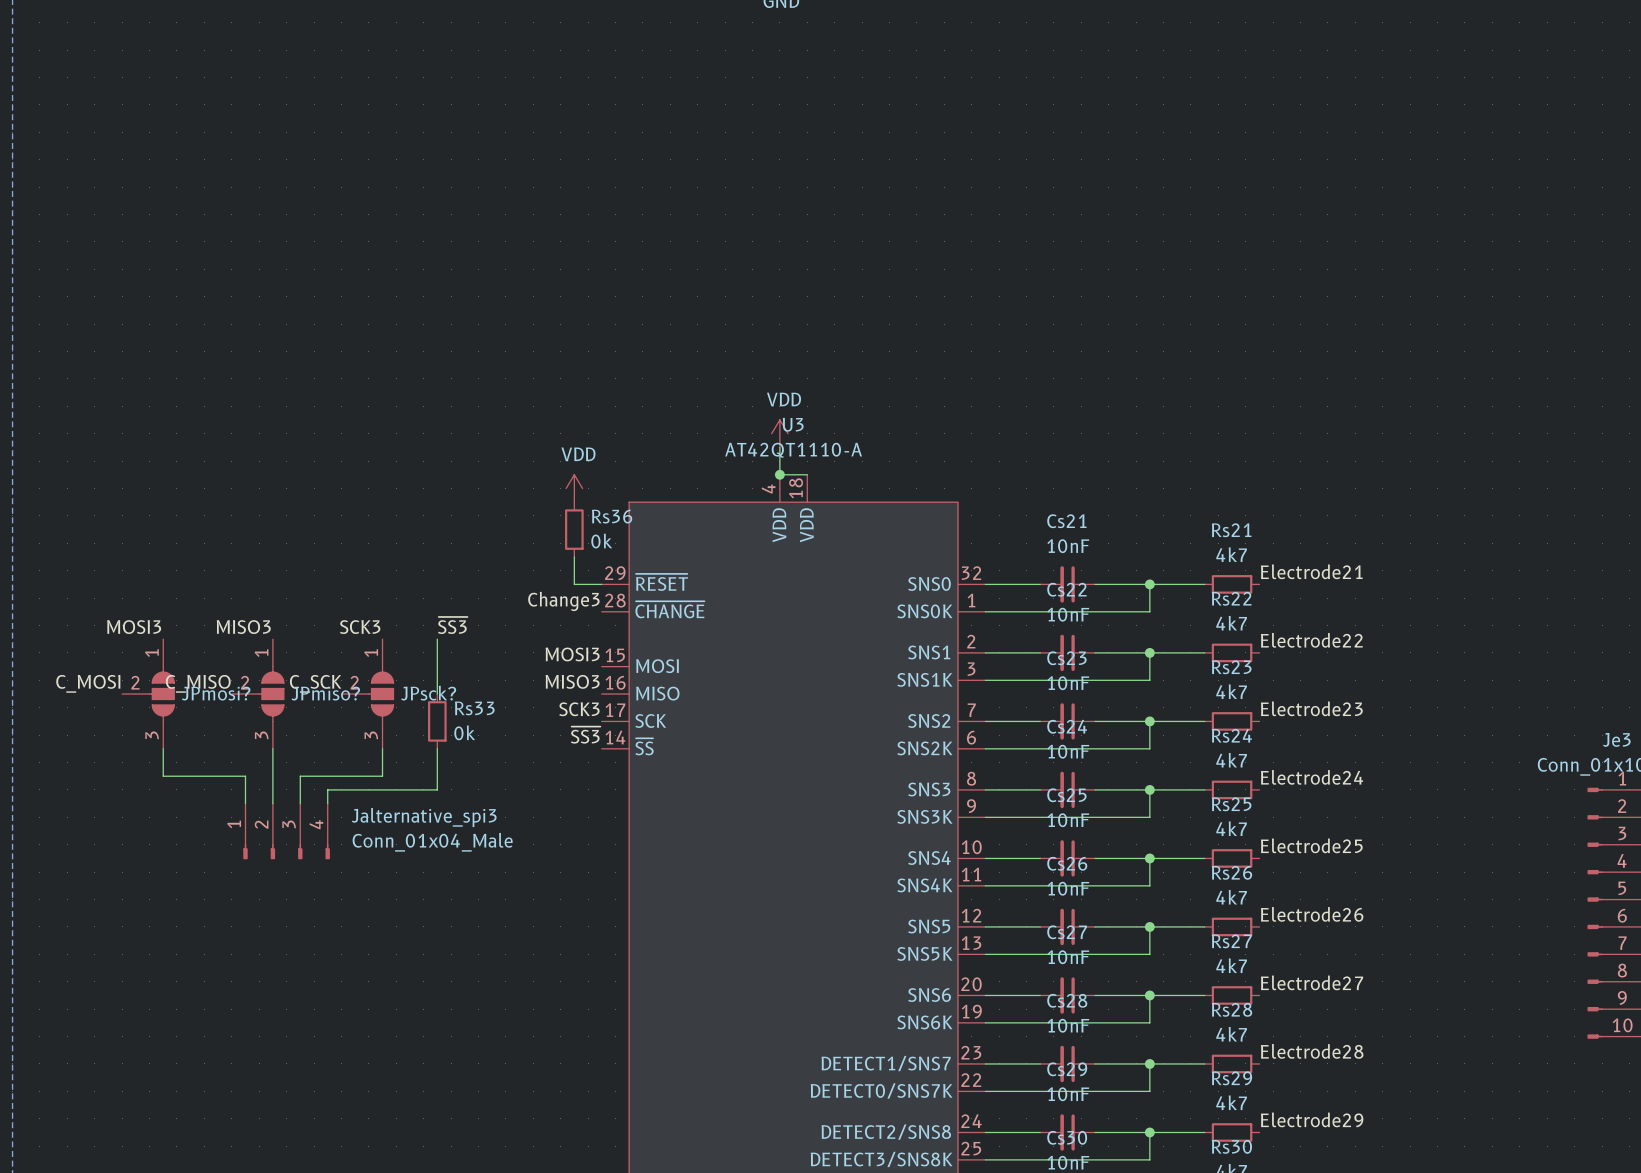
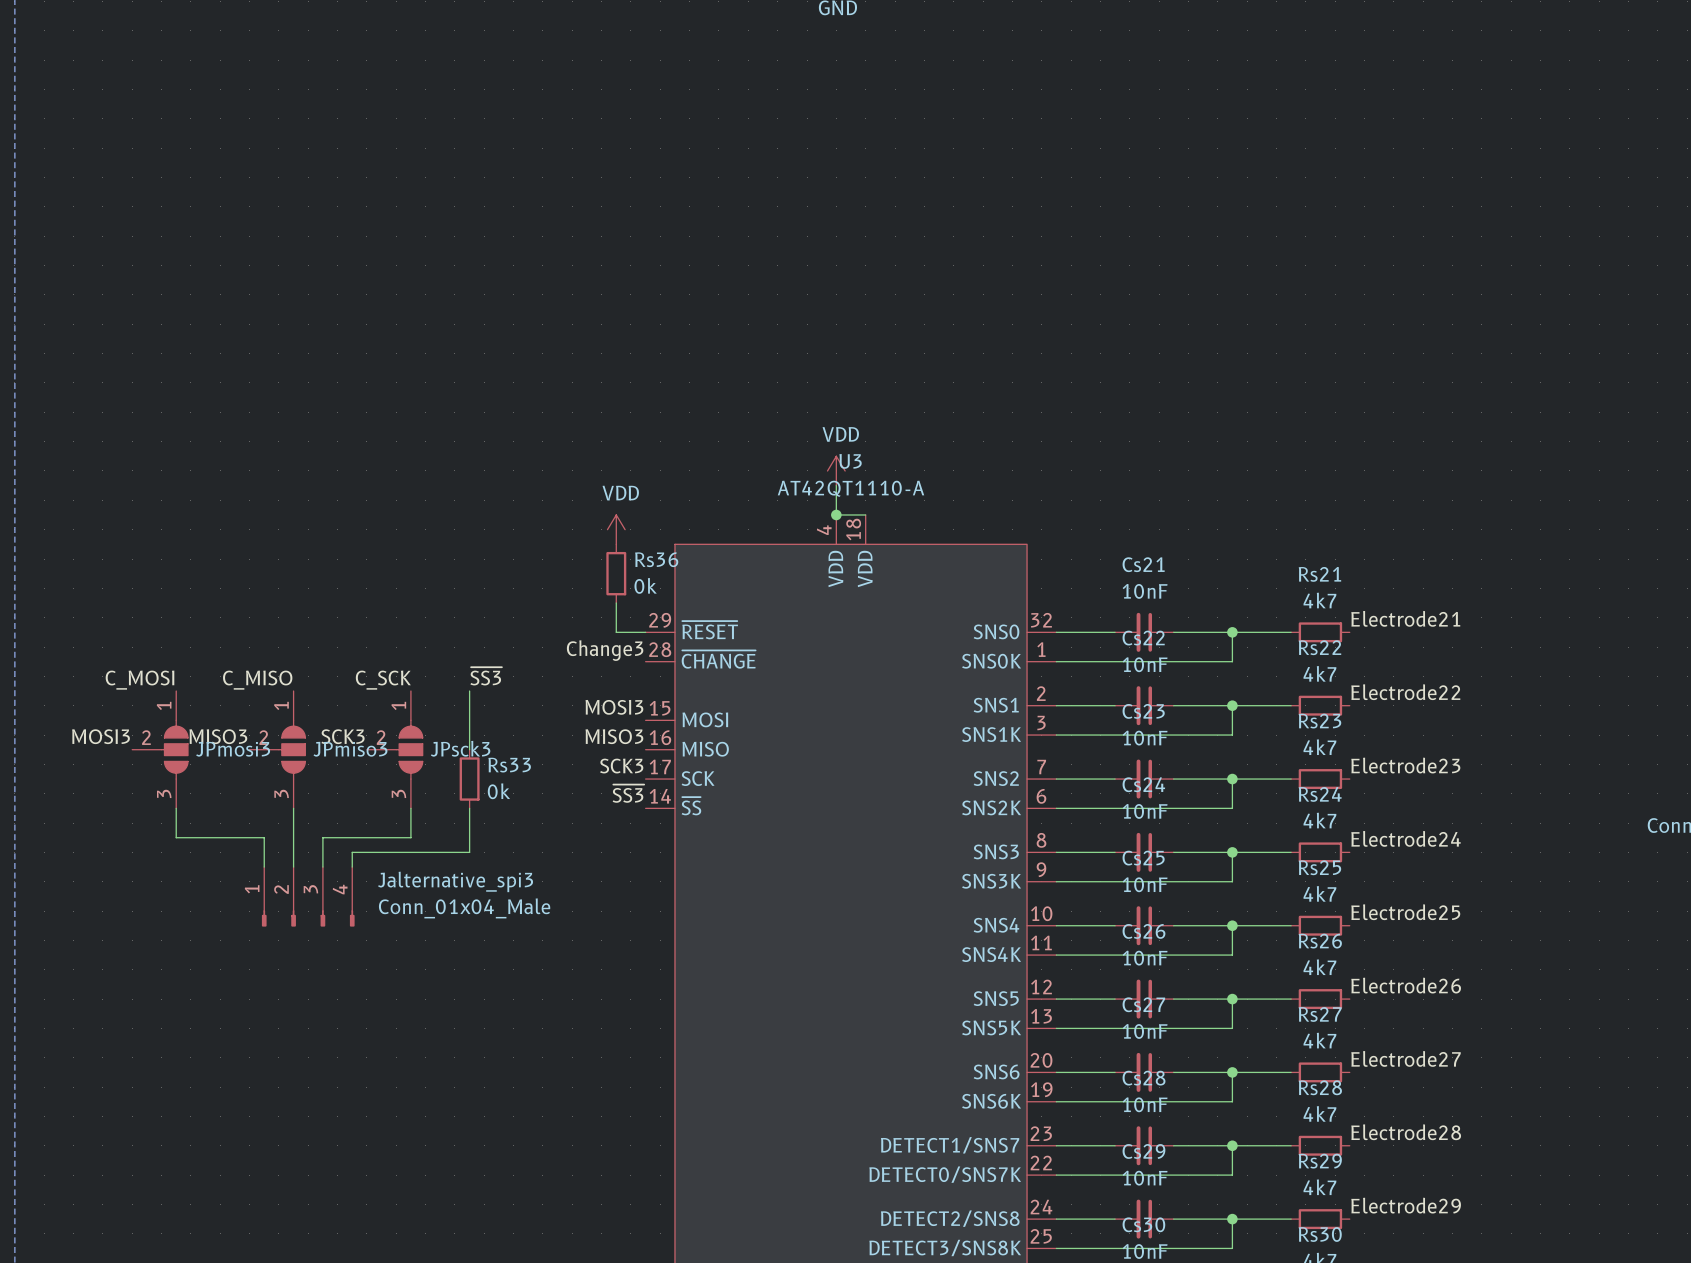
label: MOSI3 (134, 627) -> C_MOSI (139, 680)
label: MISO3 (243, 627) -> C_MISO (257, 680)
label: SCK3 (360, 627) -> C_SCK (383, 680)
label: C_MOSI (88, 683) -> MOSI3 (101, 736)
label: C_MISO (198, 683) -> MISO3 (218, 736)
label: C_SCK (315, 683) -> SCK3 (342, 736)
JPmosi? name: JPmosi? (216, 693) -> JPmosi3 (233, 749)
JPmiso? name: JPmiso? (325, 693) -> JPmiso3 (350, 749)
JPsck? name: JPsck? (428, 693) -> JPsck3 (460, 748)

